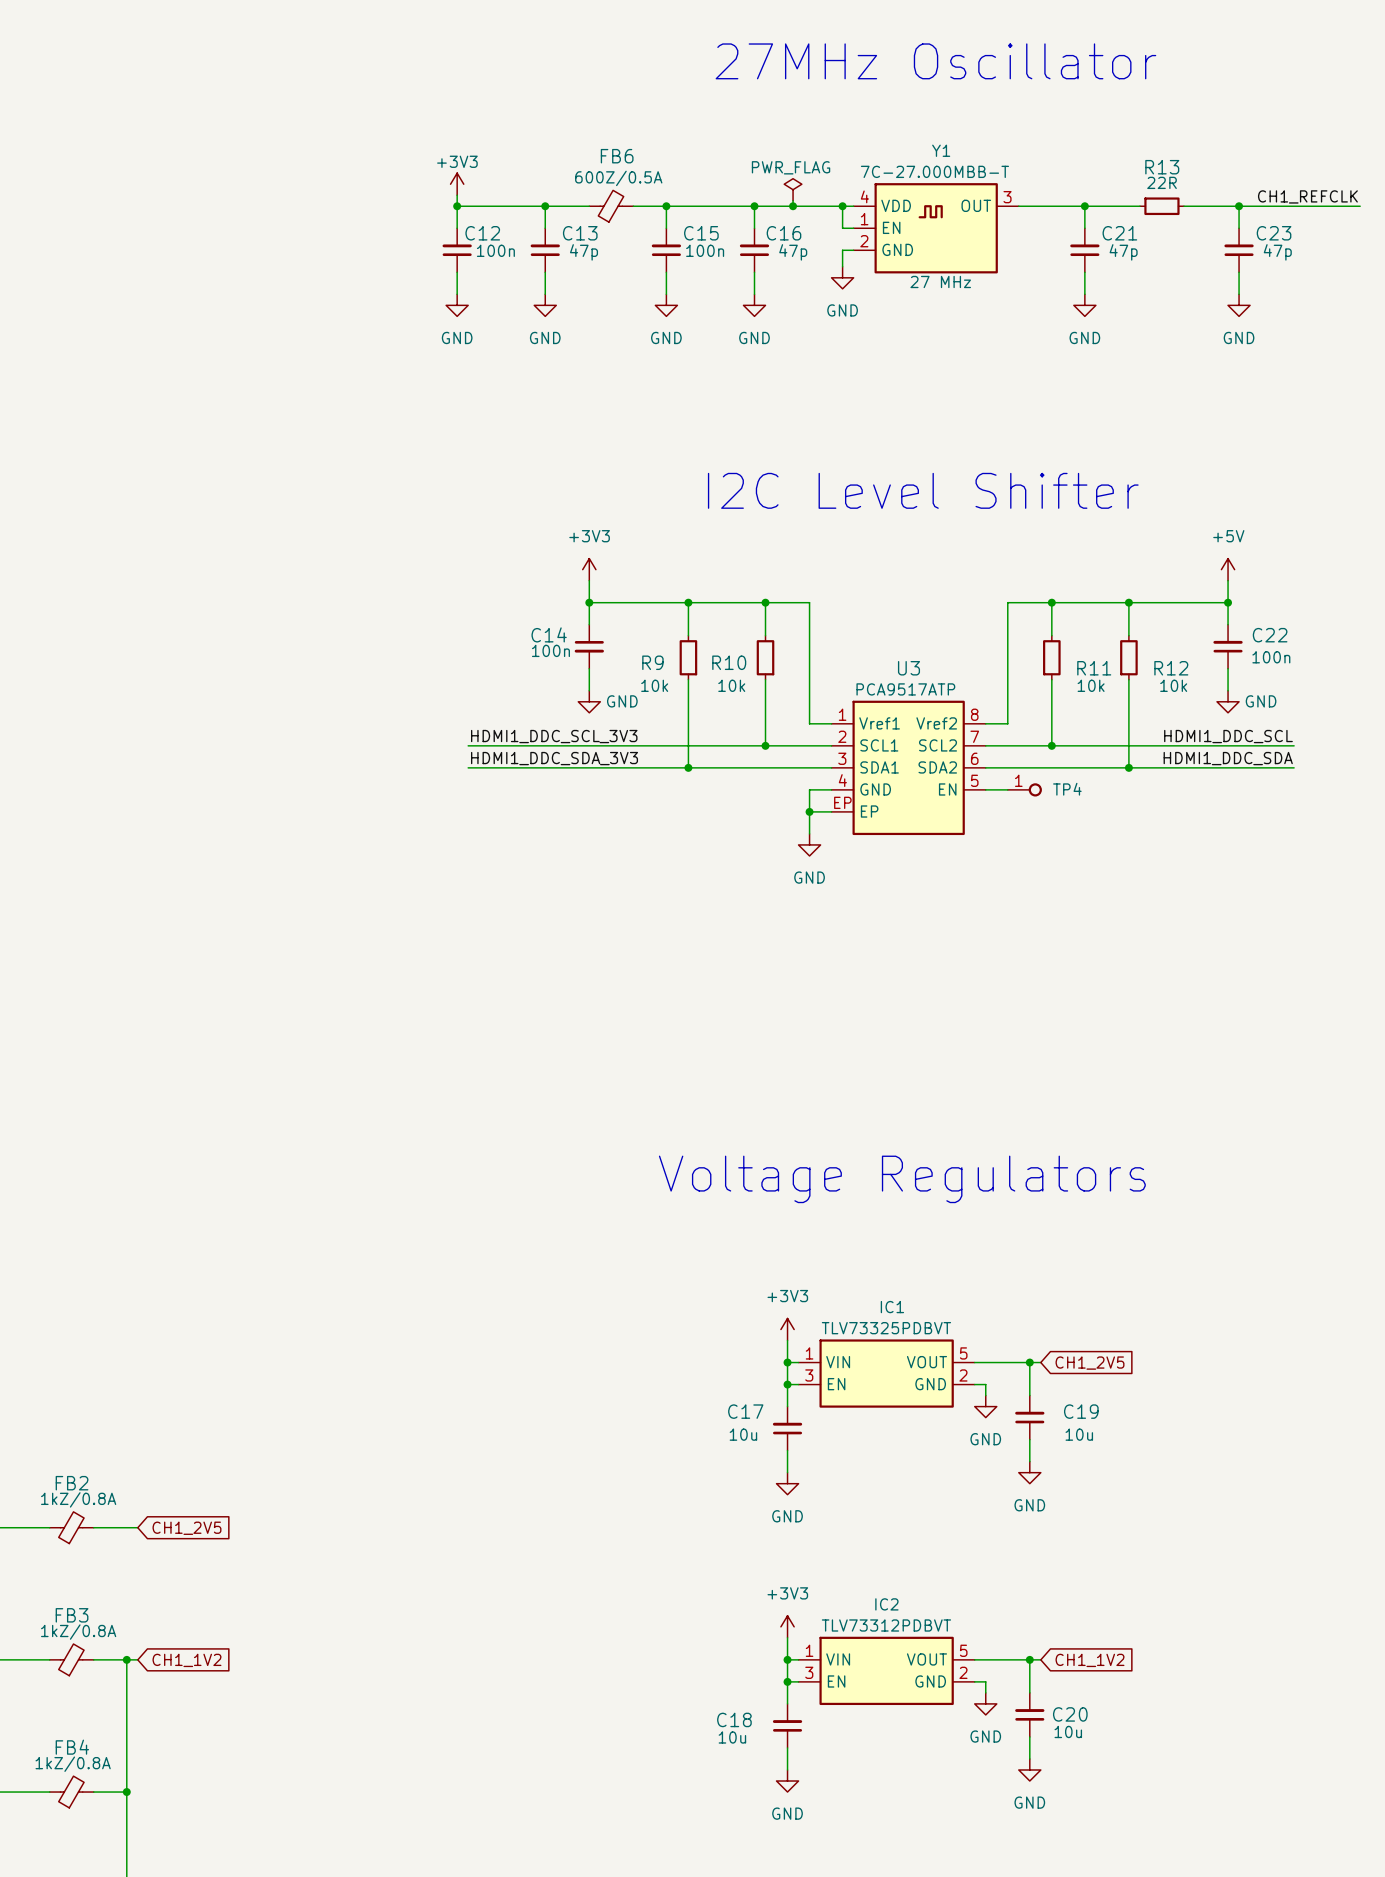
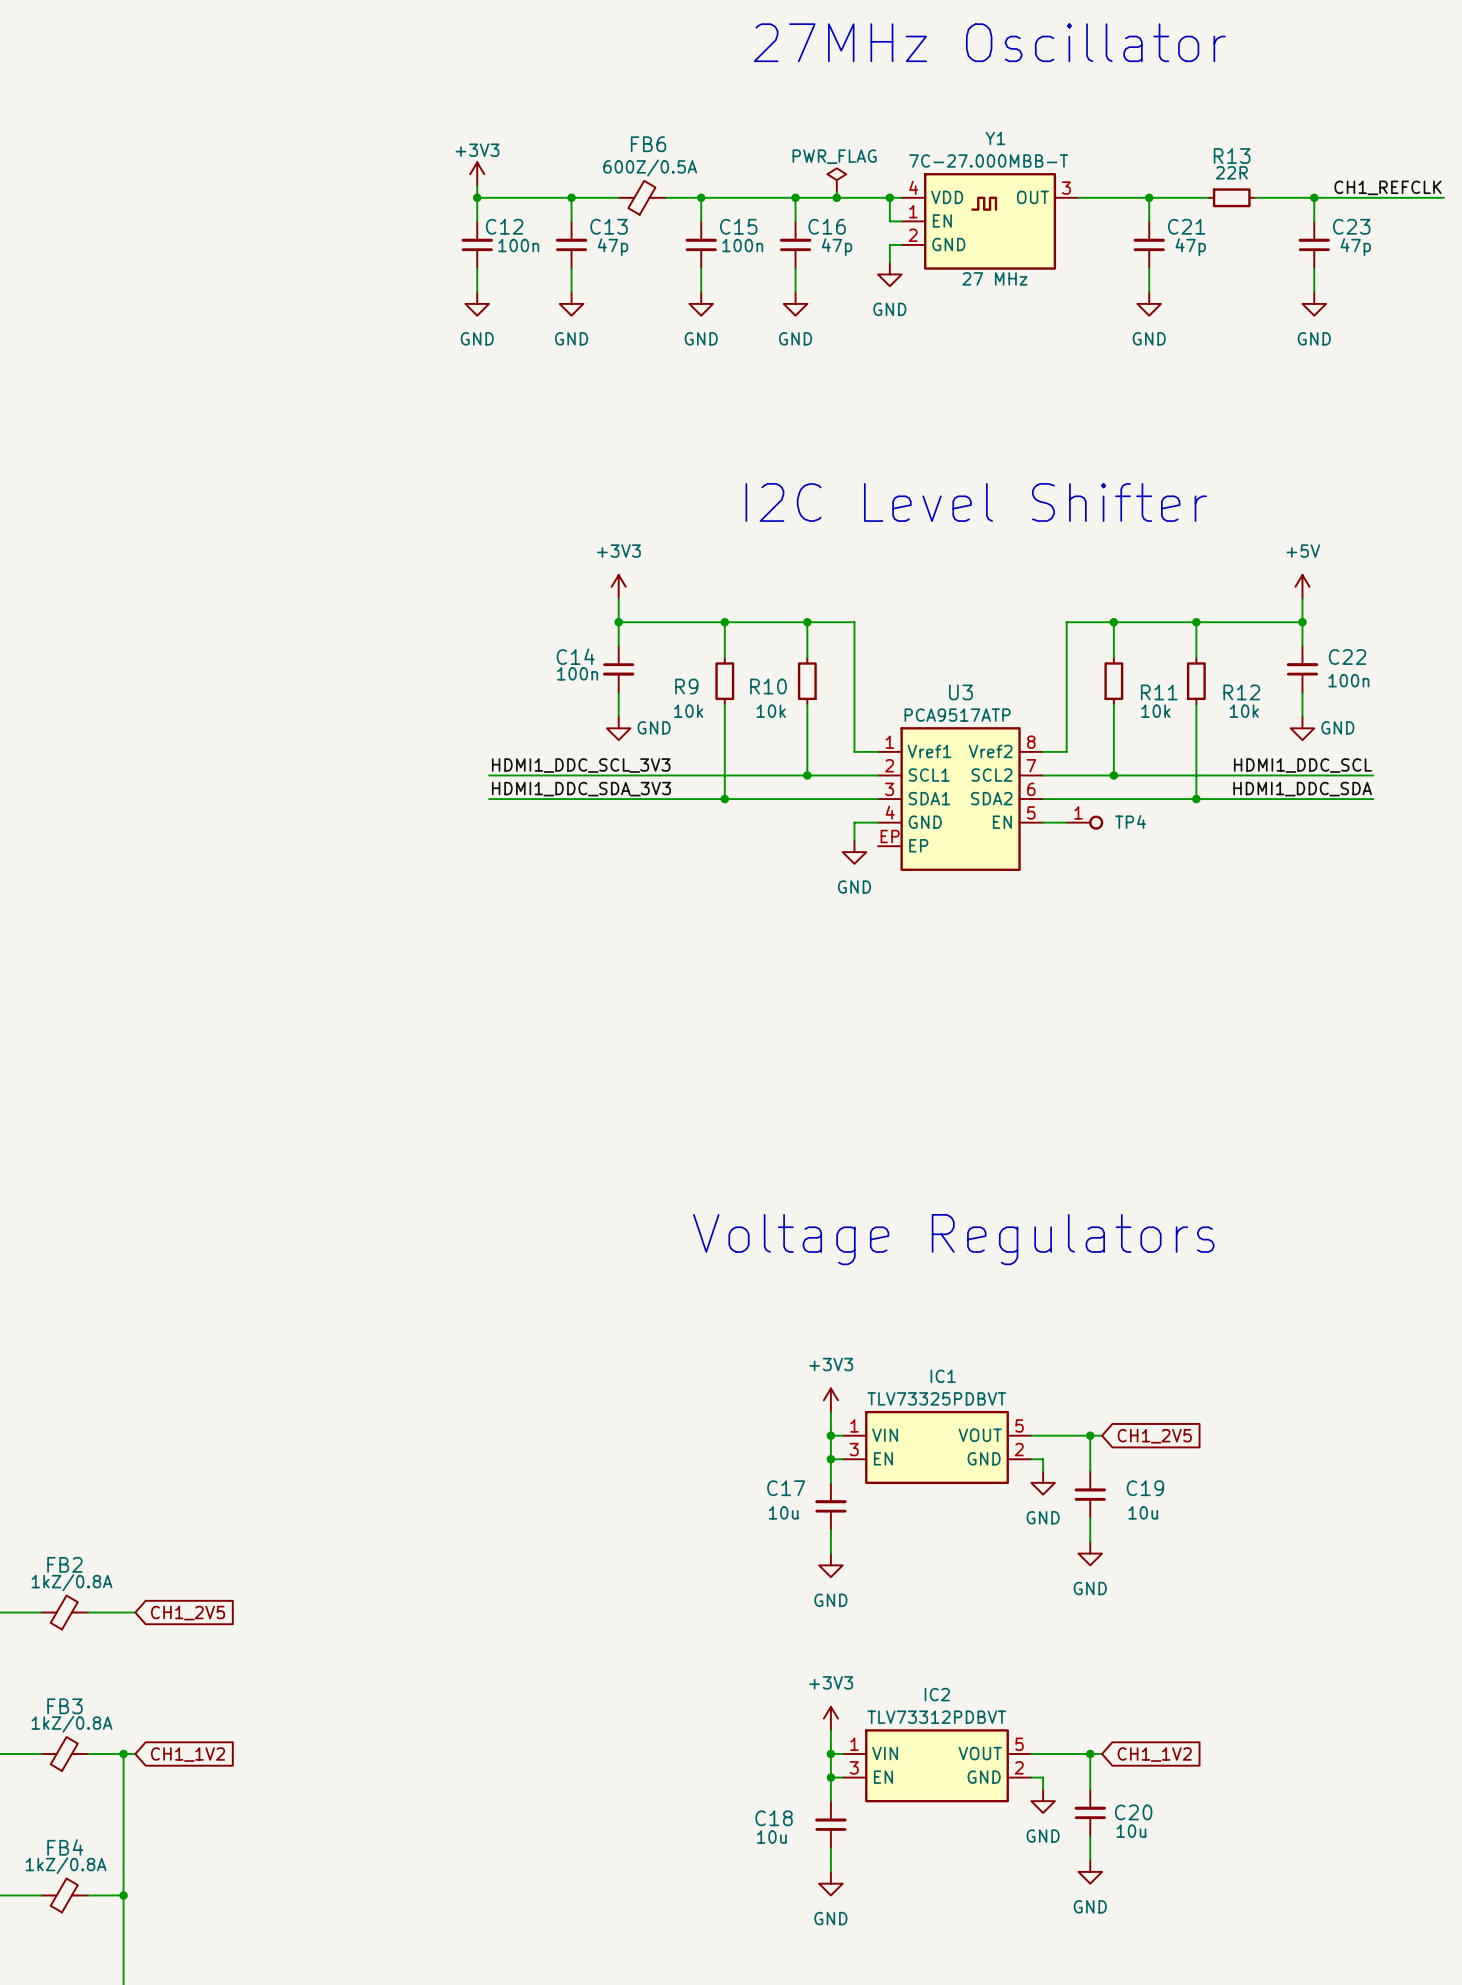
wire: (809, 811) (831, 811) -> none
junction: (809, 811) -> none
power symbol position: GND (809, 844) -> GND (854, 852)

